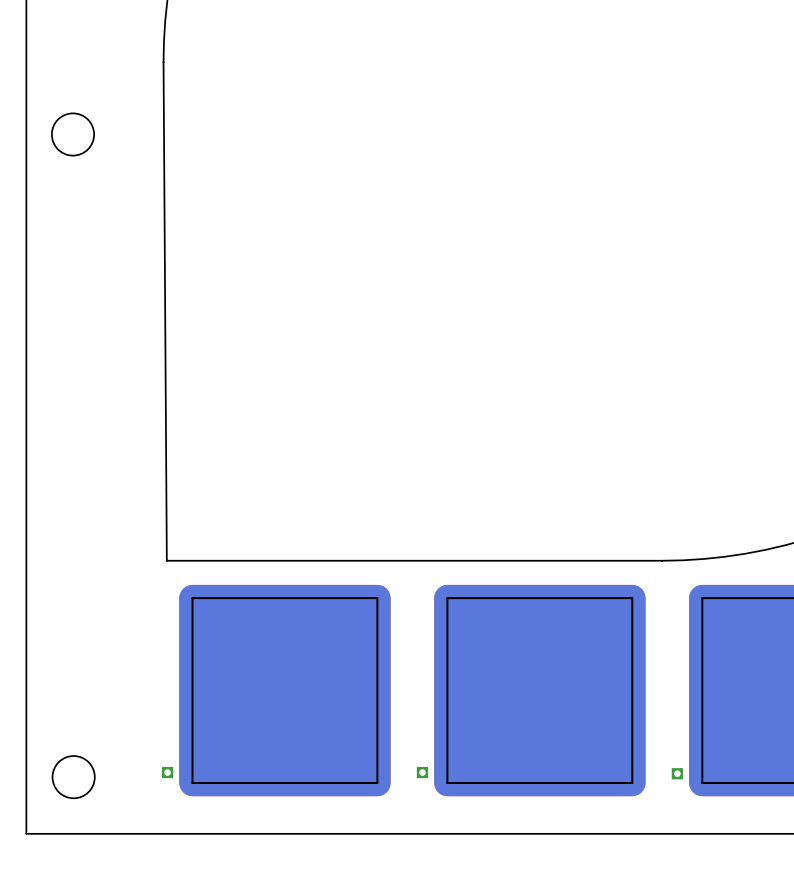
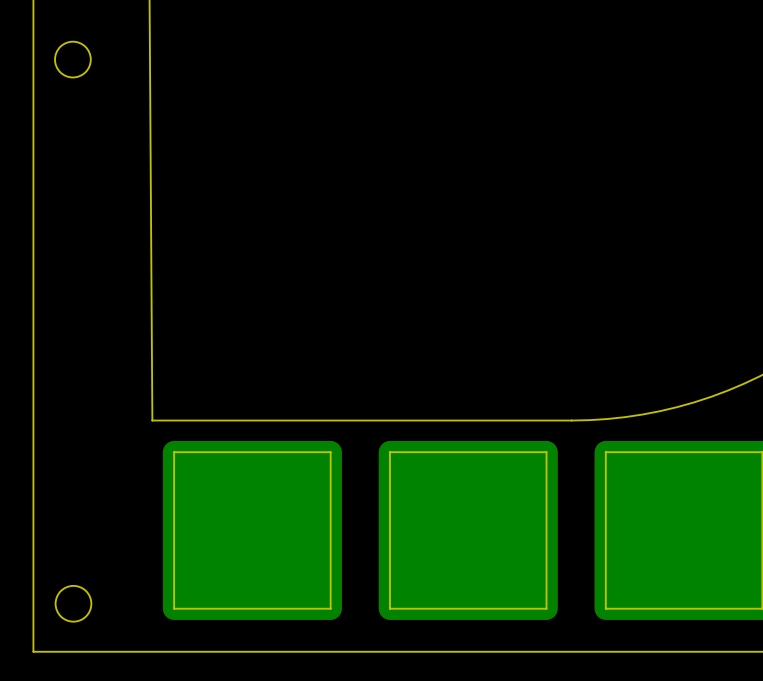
part: (167, 772) -> none
part: (422, 772) -> none
part: (677, 773) -> none

